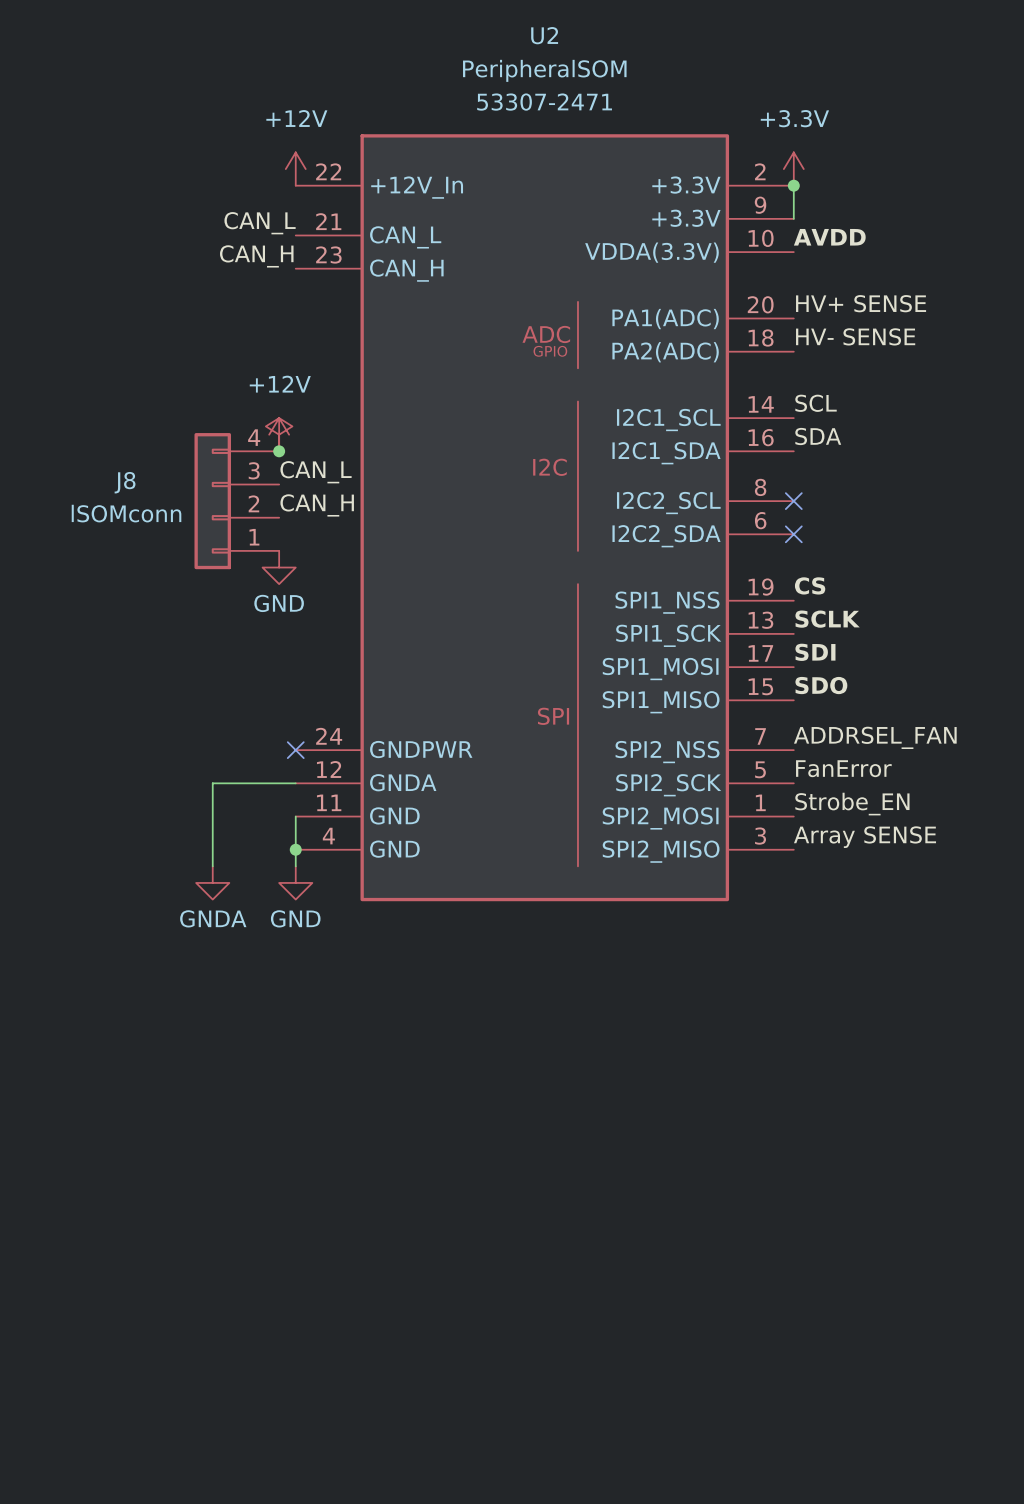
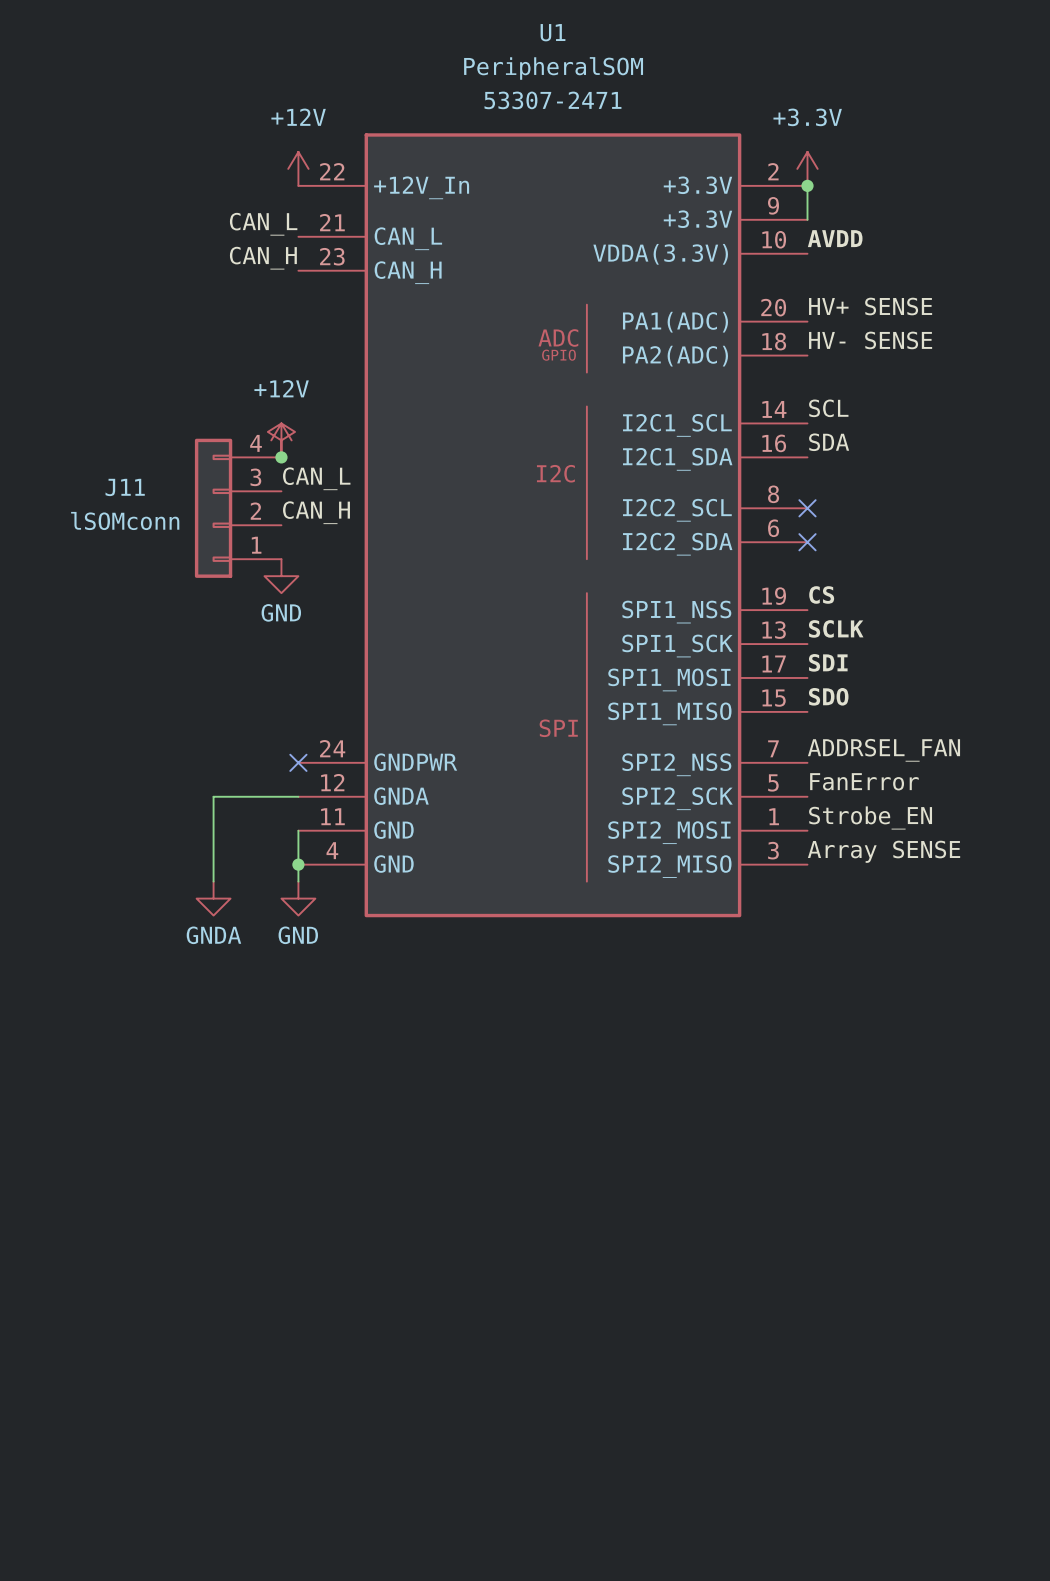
U2 name: U2 (544, 35) -> U1 (553, 32)
J8 name: J8 (125, 482) -> J11 (125, 487)

